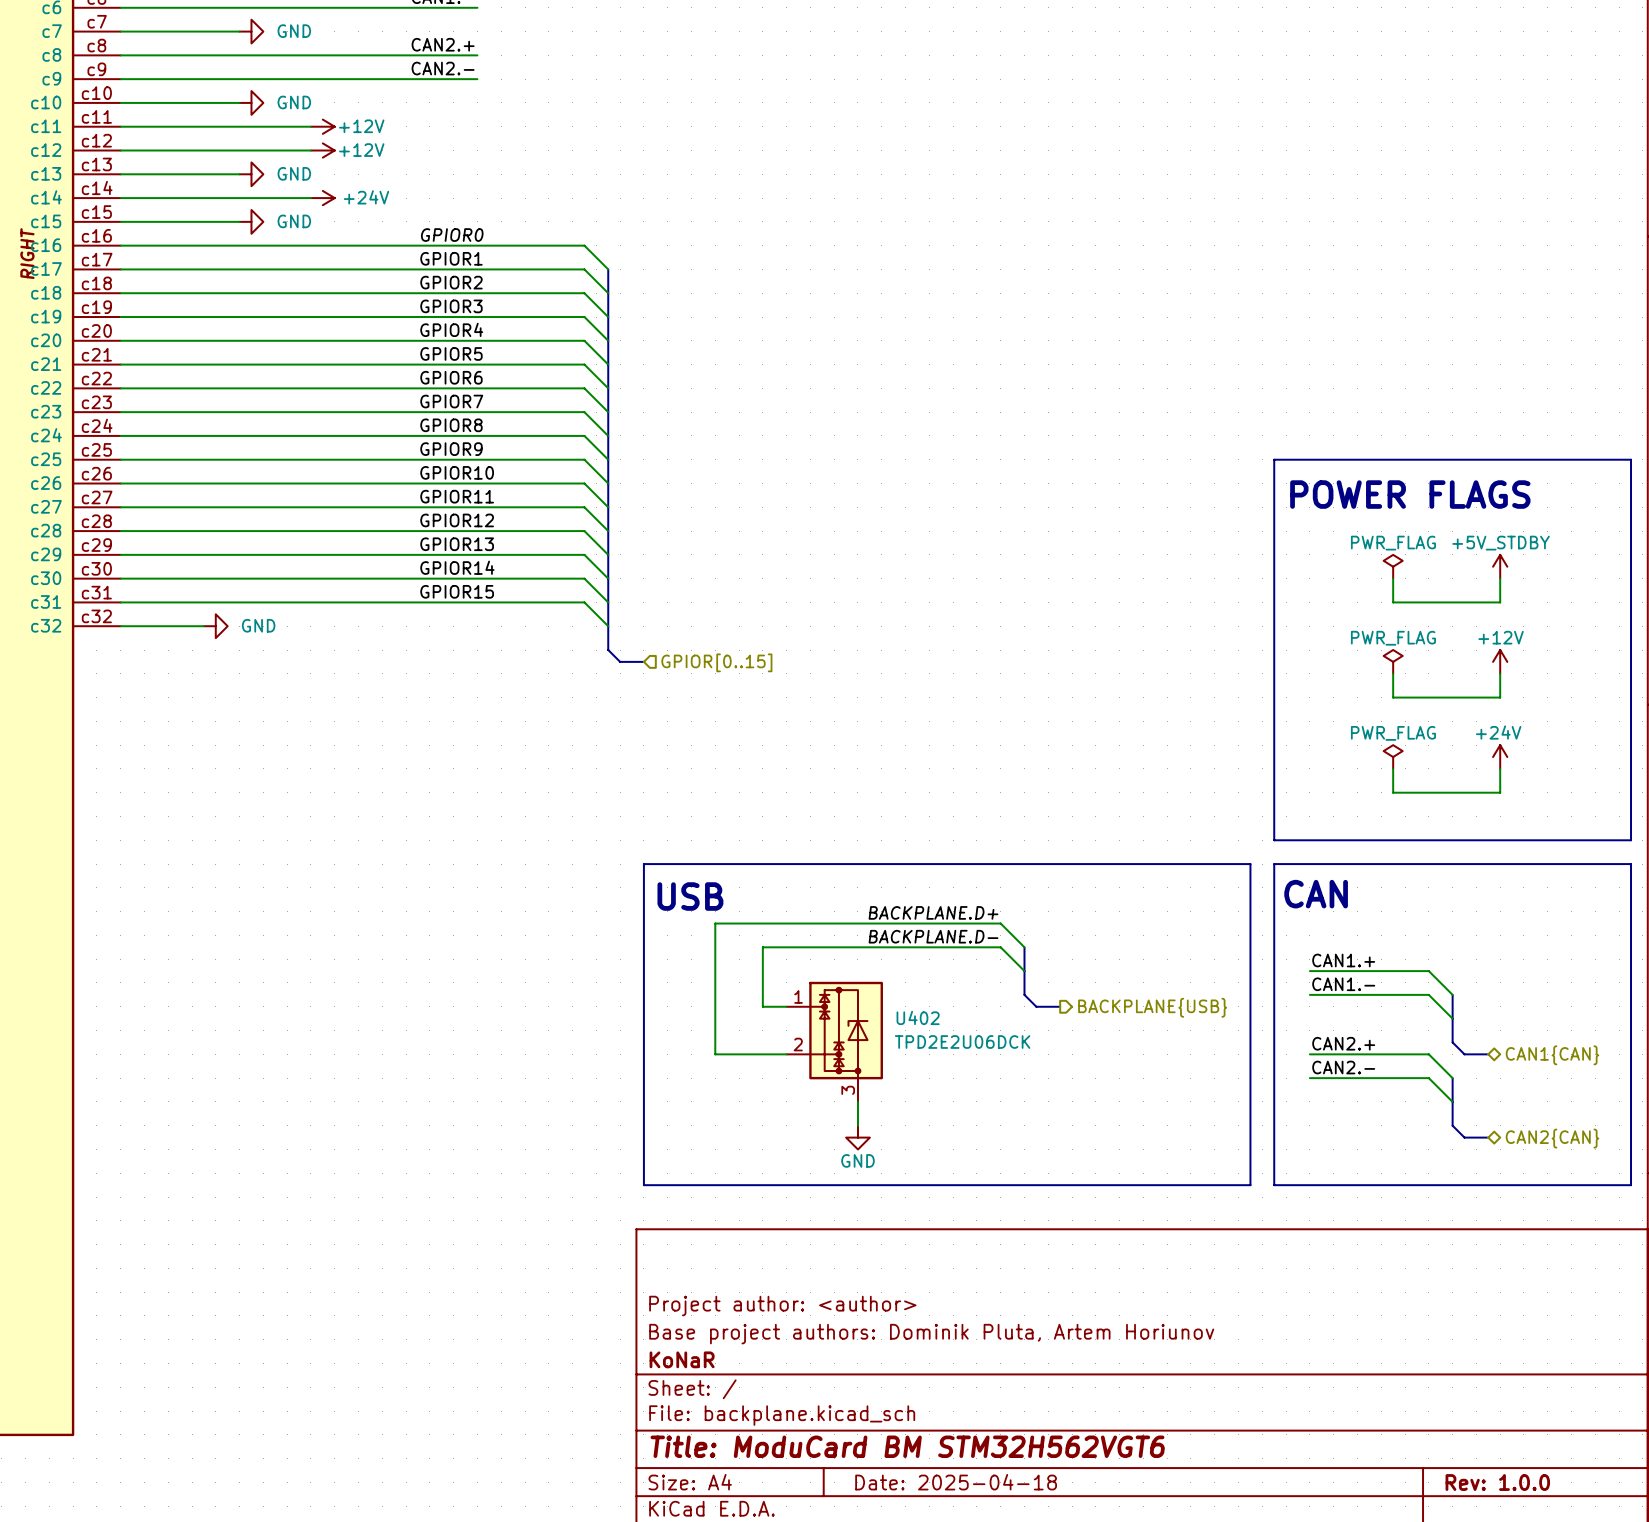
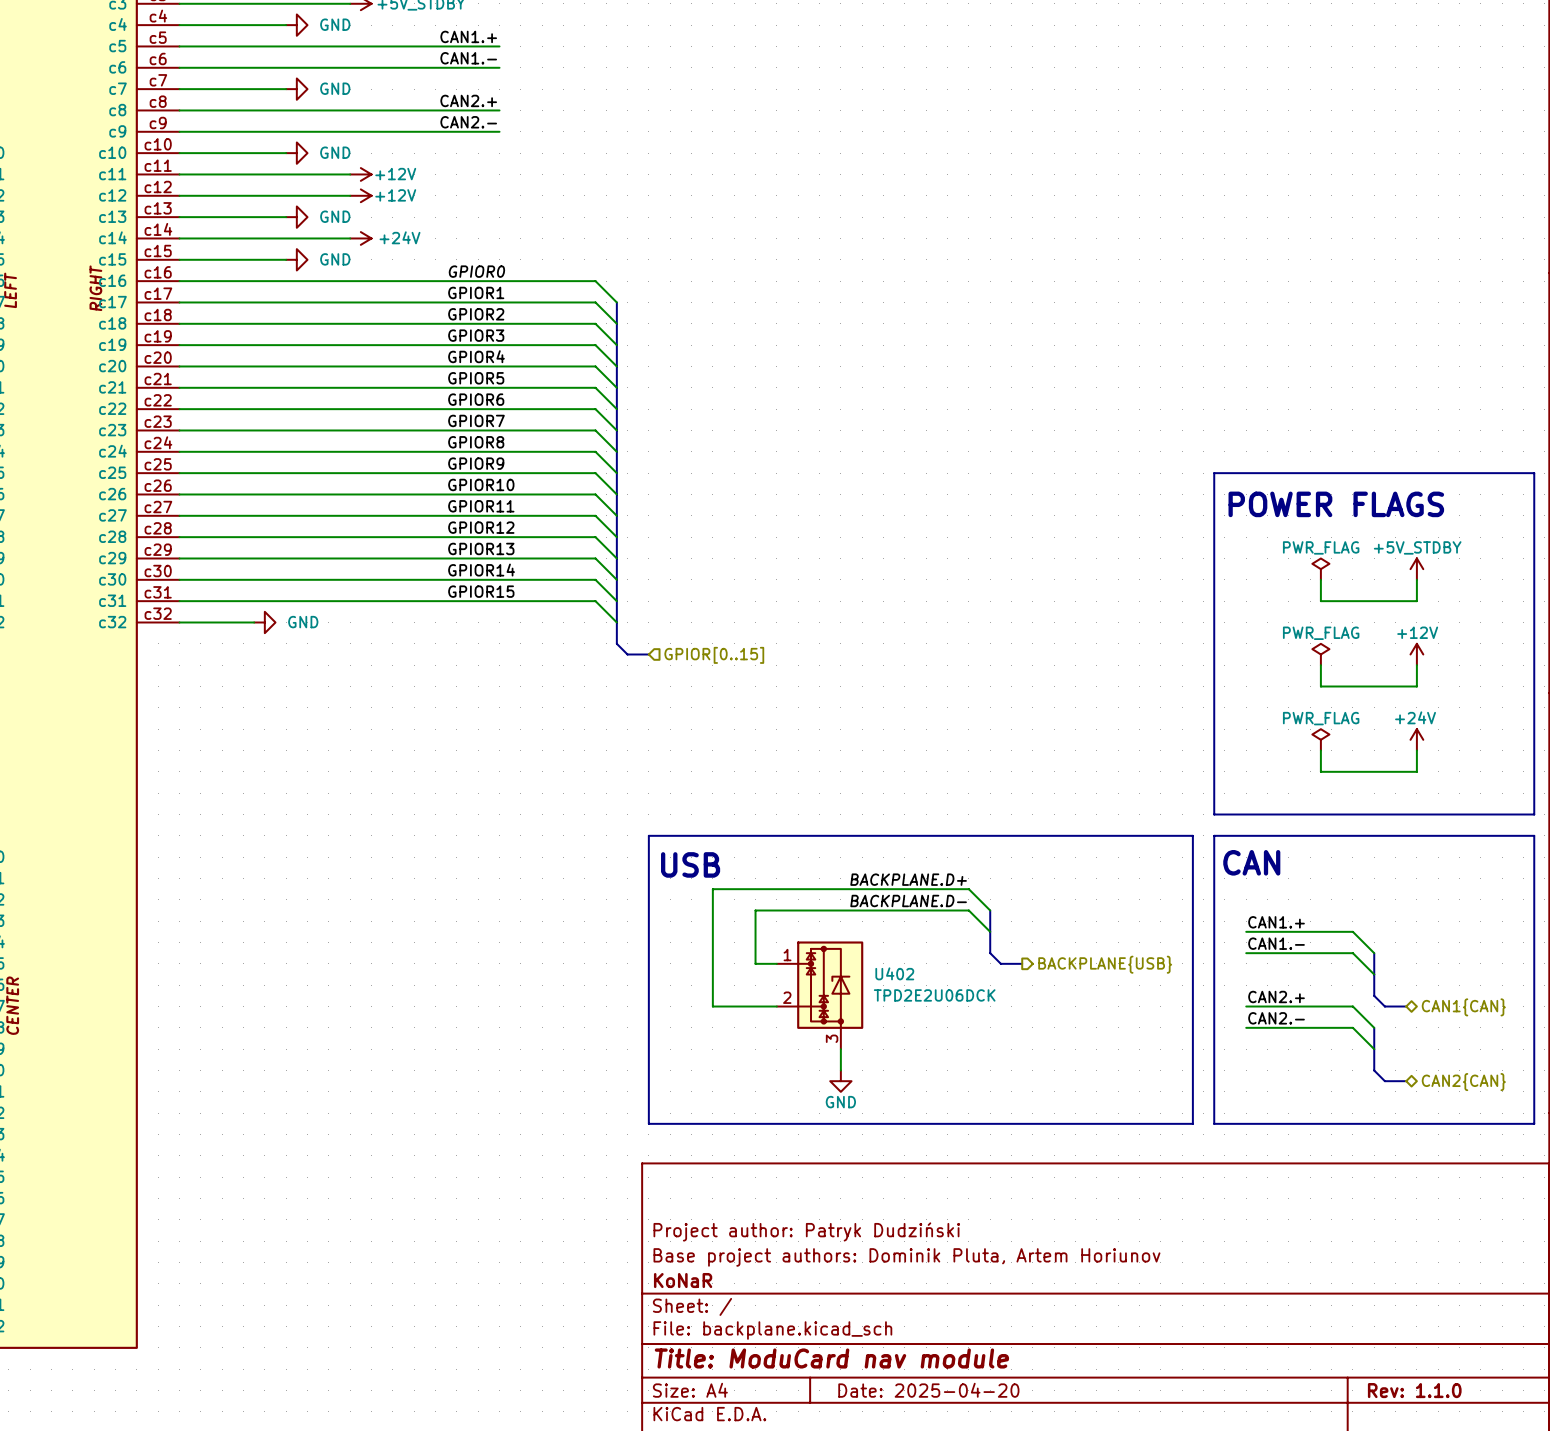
title block: Project author: <author> (782, 1306) -> Project author: Patryk Dudziński (806, 1231)
title block: Title: ModuCard BM STM32H562VGT6 (907, 1446) -> Title: ModuCard nav module (831, 1358)
title block: Date: 2025-04-18 (956, 1482) -> Date: 2025-04-20 (928, 1390)
title block: Rev: 1.0.0 (1497, 1482) -> Rev: 1.1.0 (1414, 1390)

